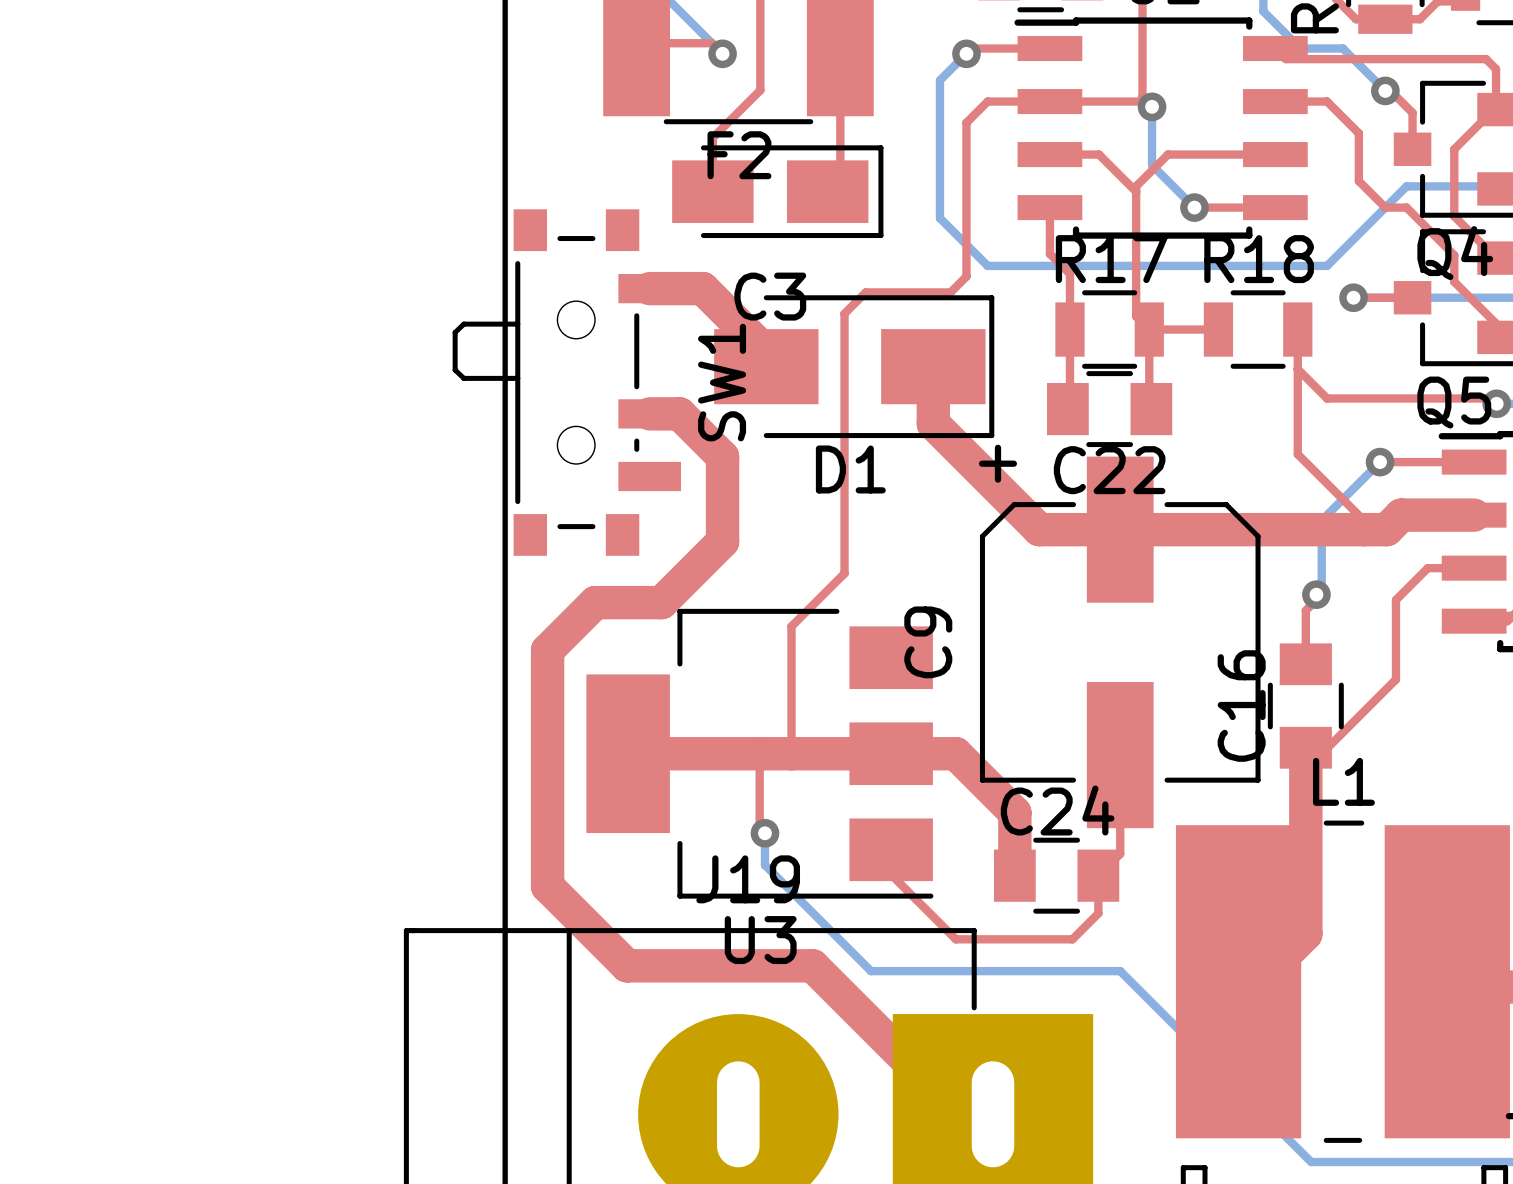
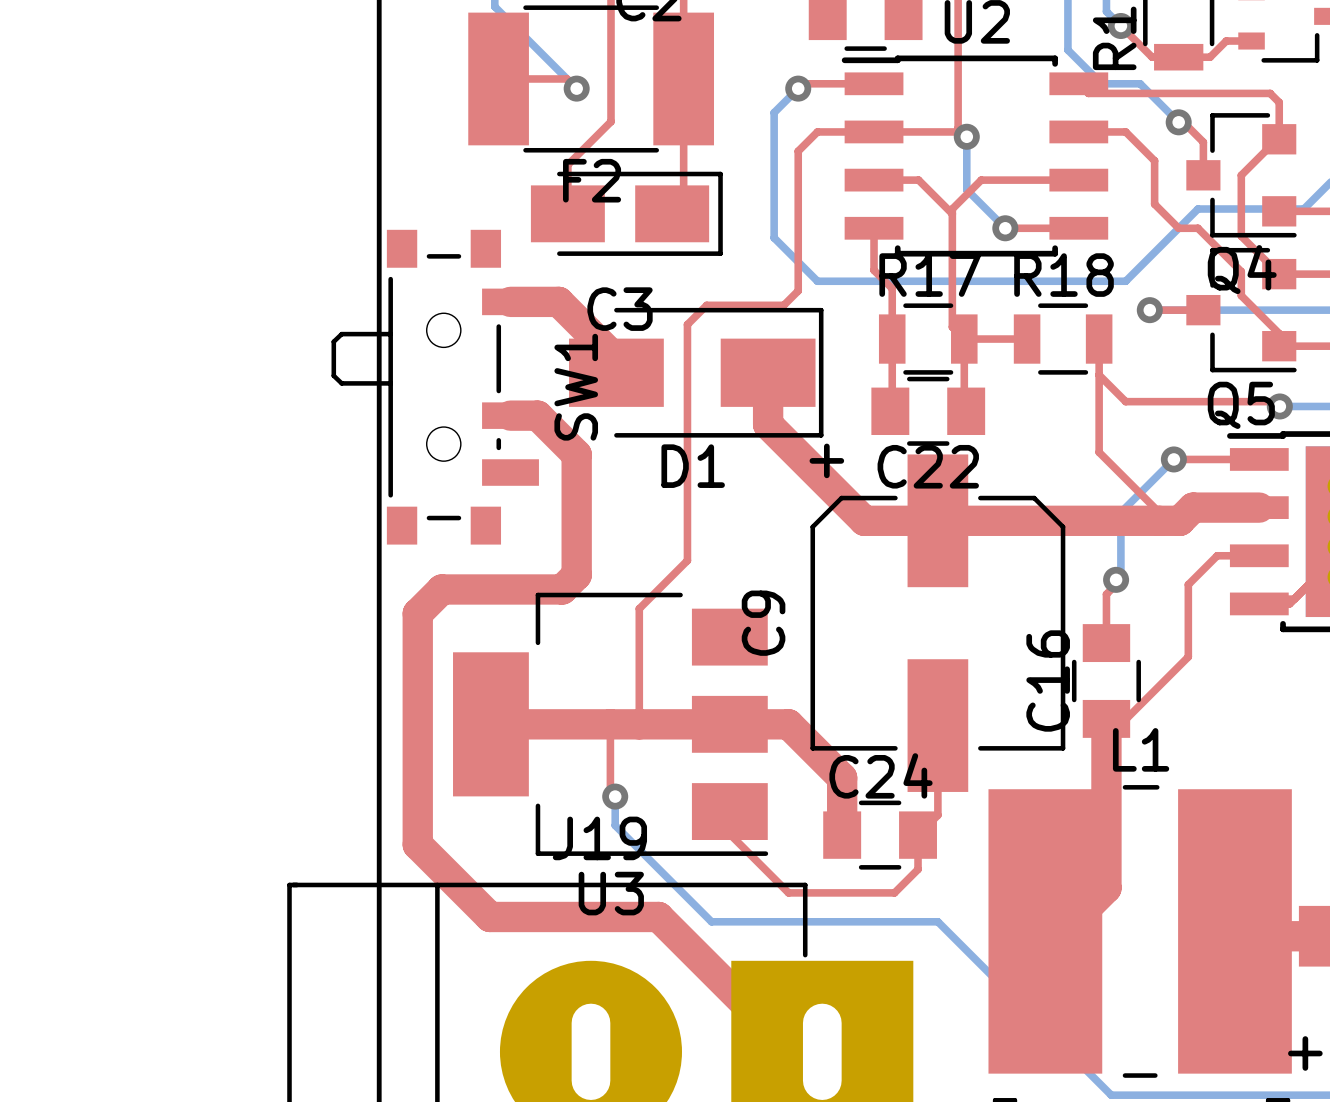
top track: (722, 541) (661, 602) (595, 602) (547, 650) -> (576, 531) (576, 575) (562, 589) (441, 589) (417, 613) (417, 630)

